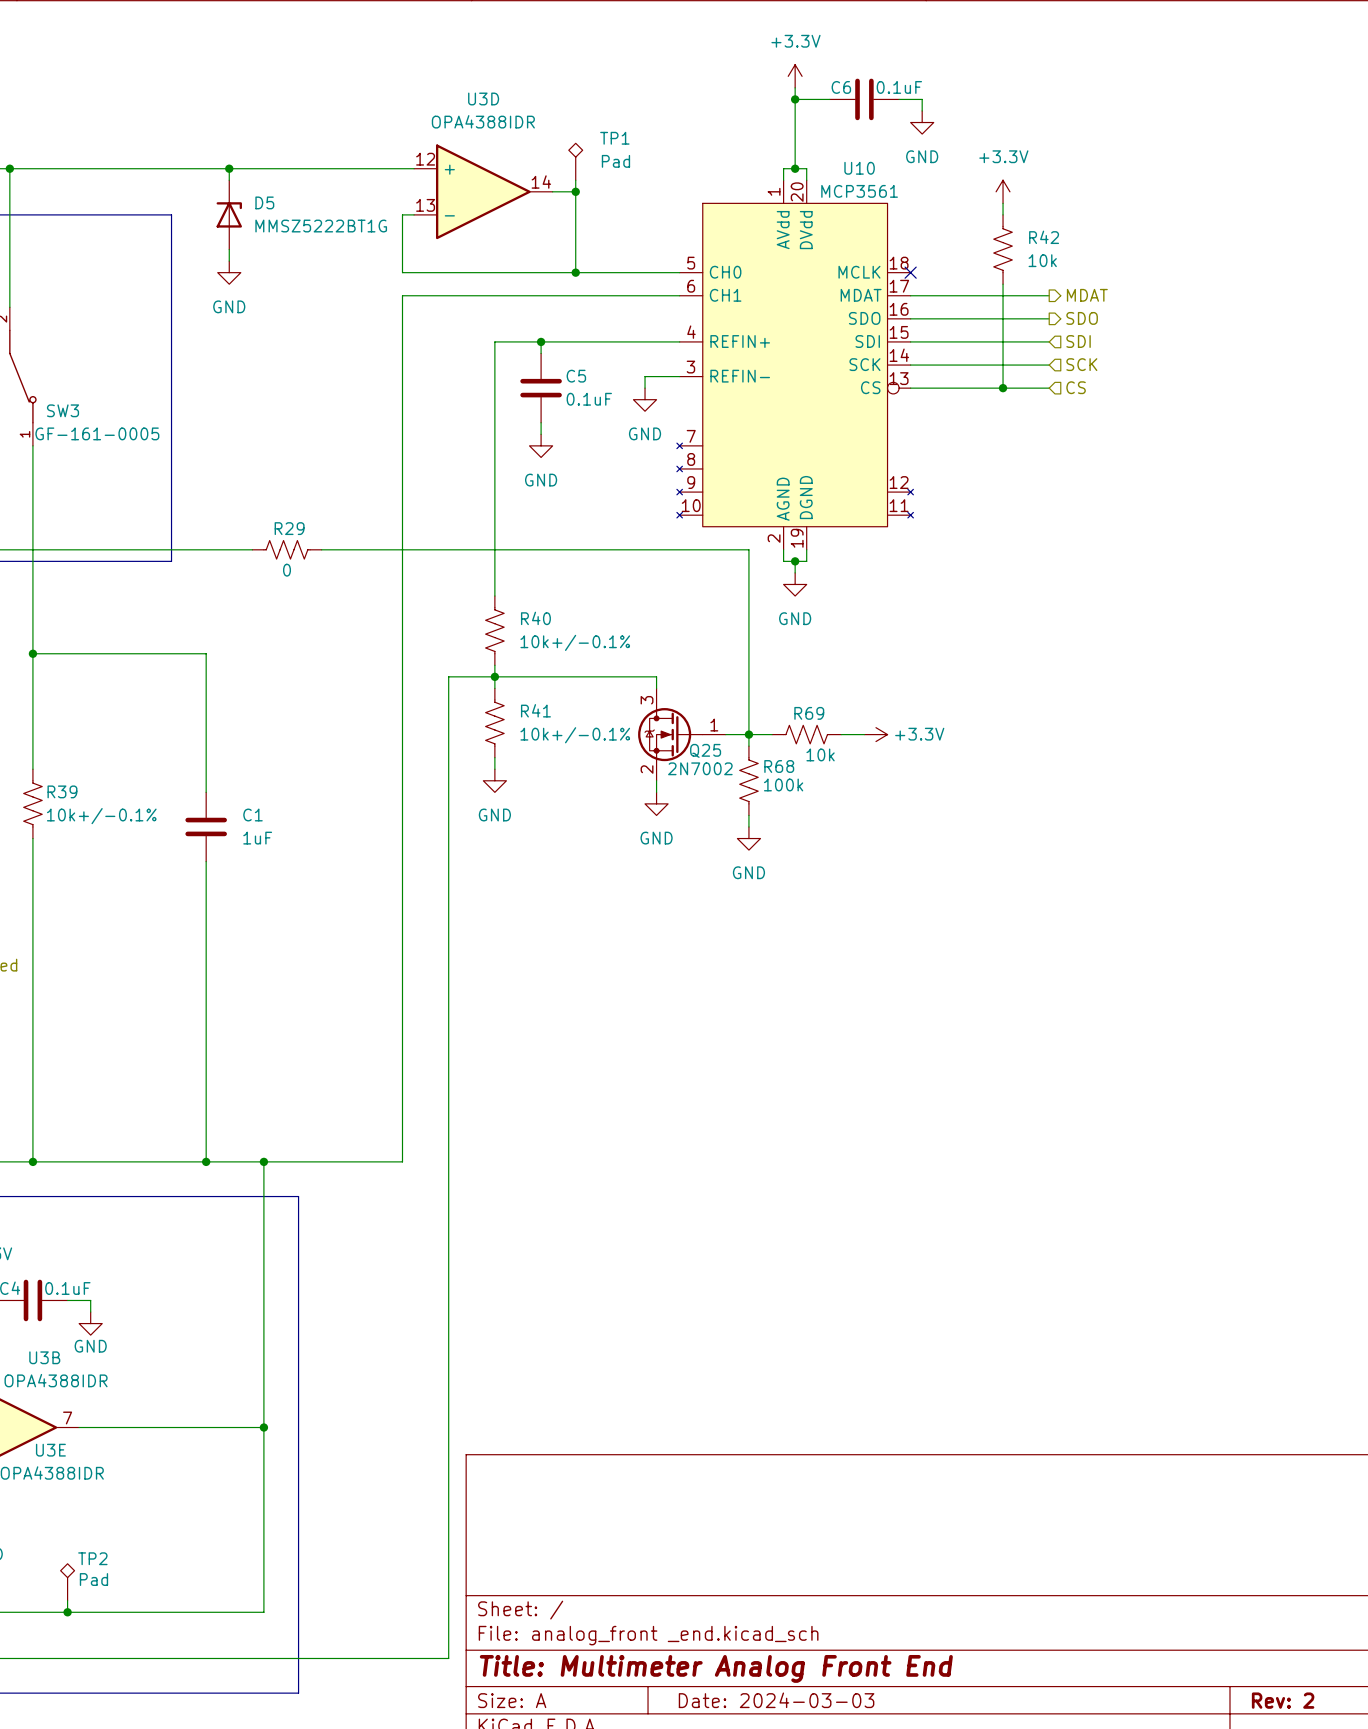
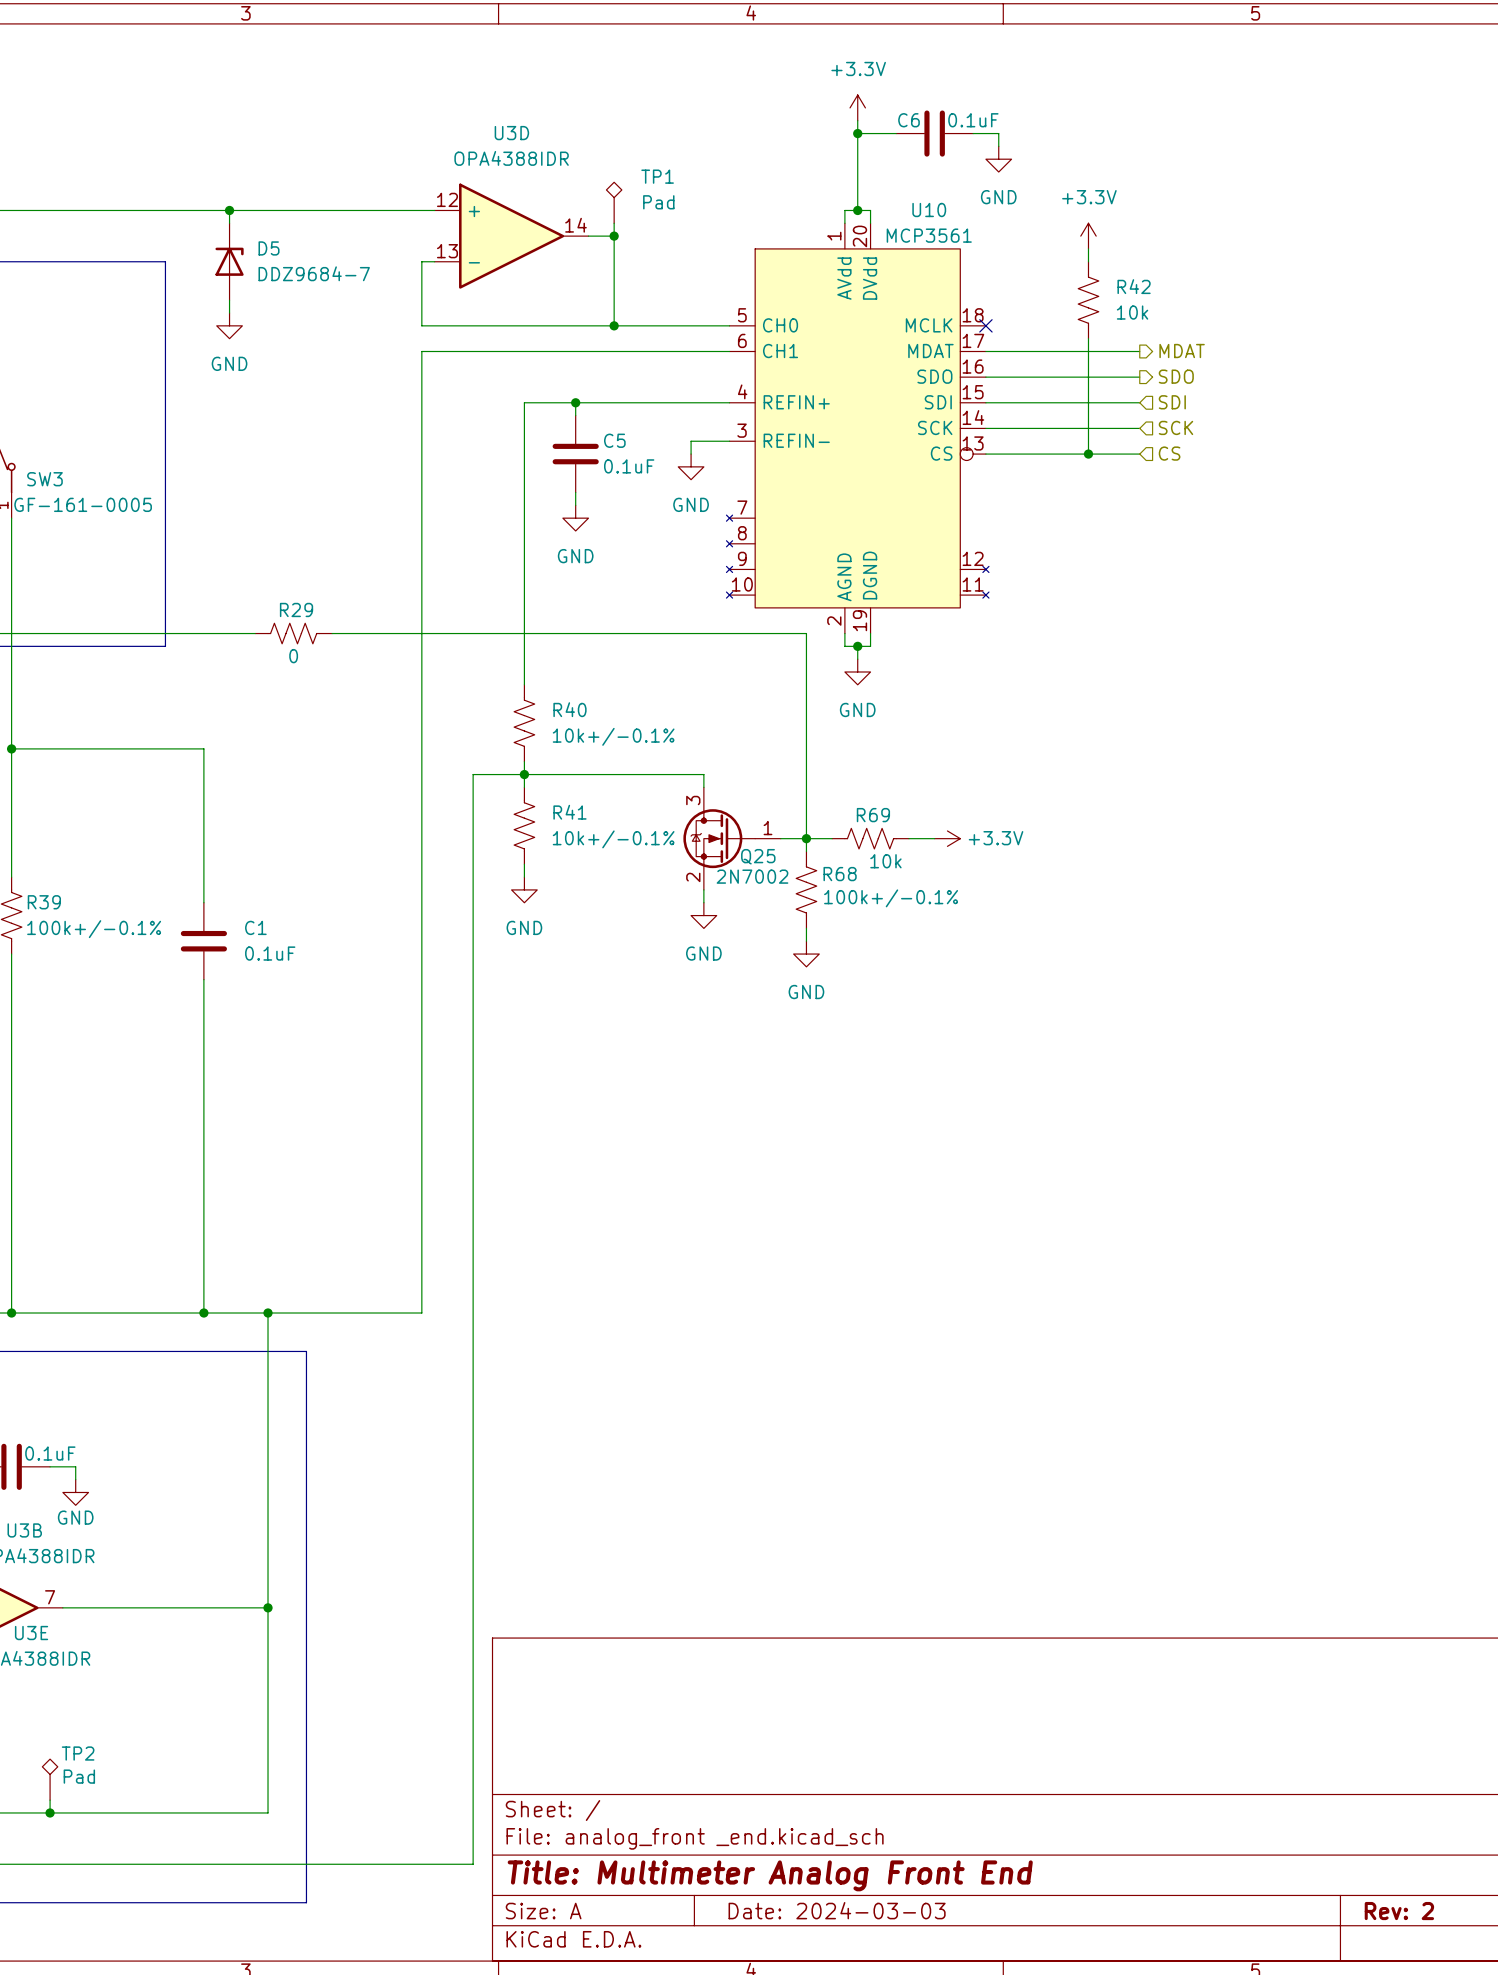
D5 value: MMSZ5222BT1G (321, 226) -> DDZ9684-7 (314, 273)
R68 value: 100k (783, 784) -> 100k+/-0.1% (891, 898)
R39 value: 10k+/-0.1% (101, 816) -> 100k+/-0.1% (94, 929)
C1 value: 1uF (257, 838) -> 0.1uF (270, 953)

